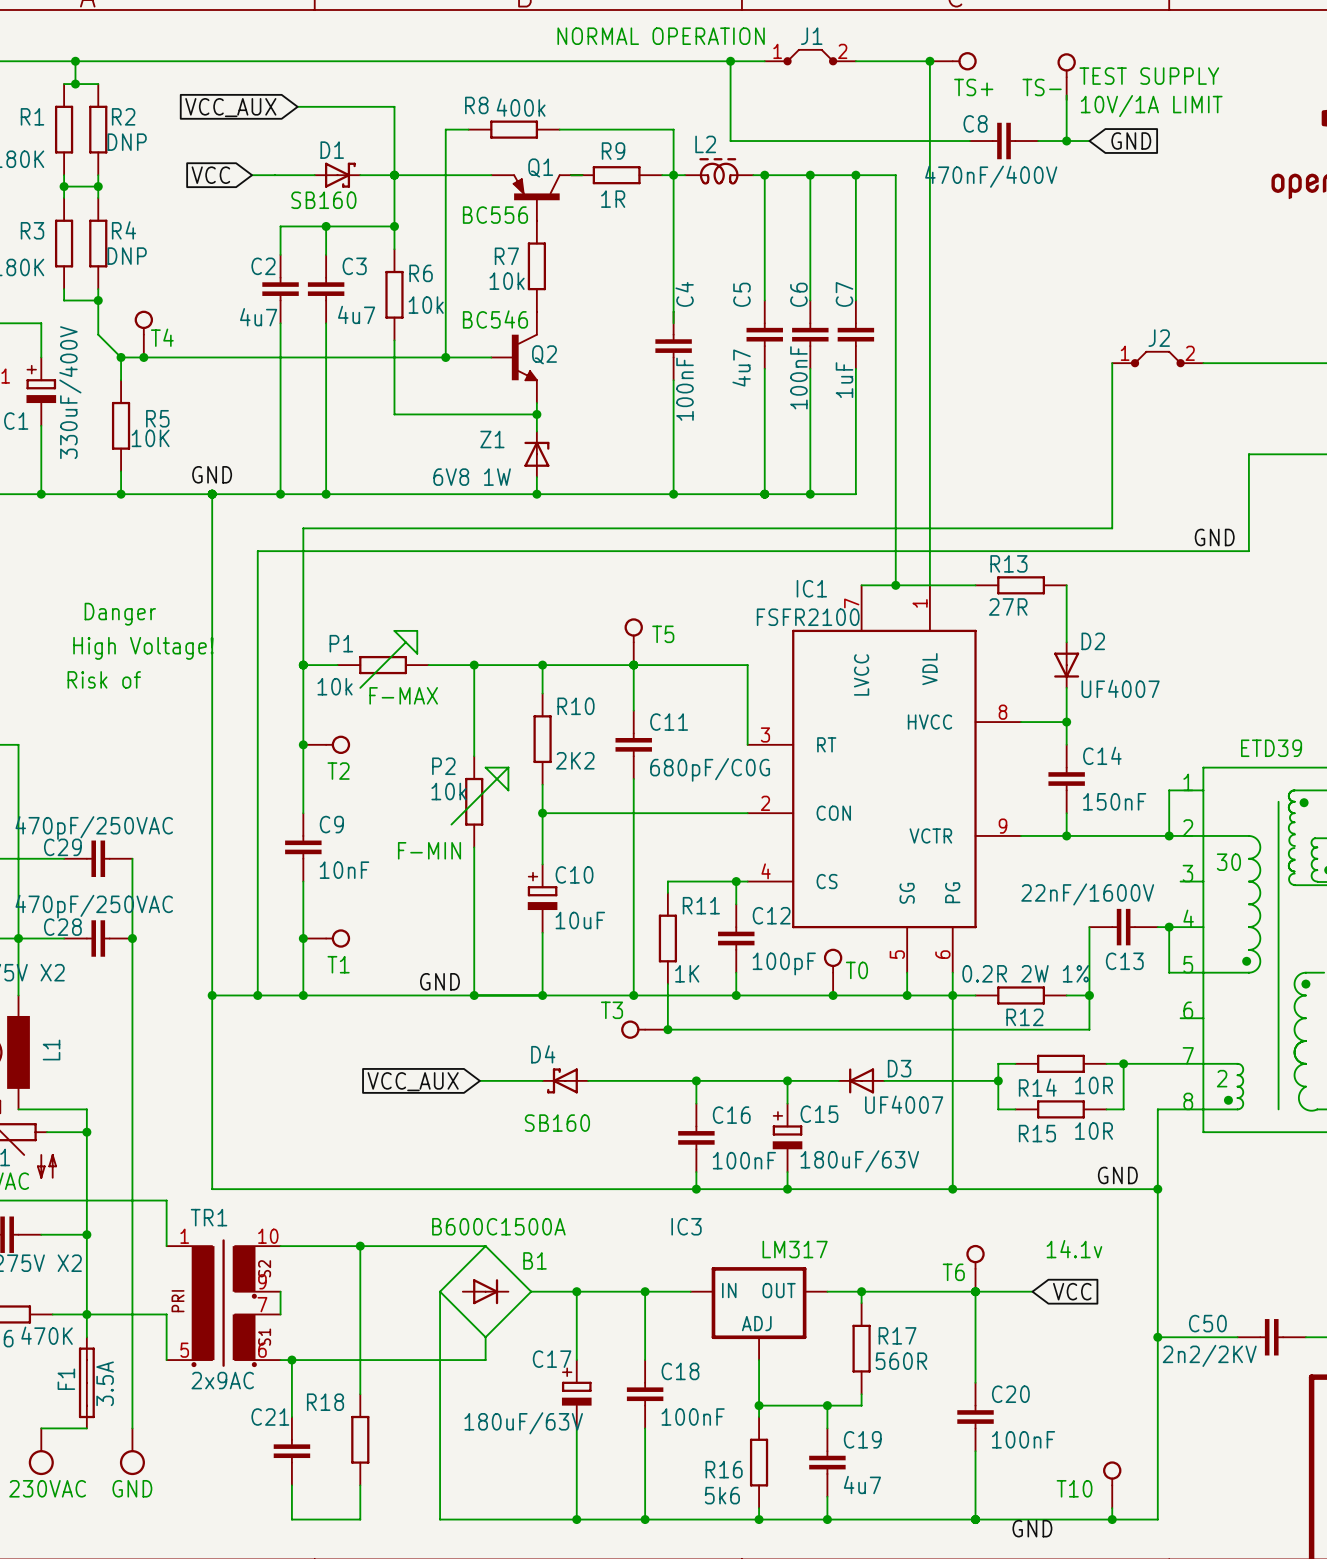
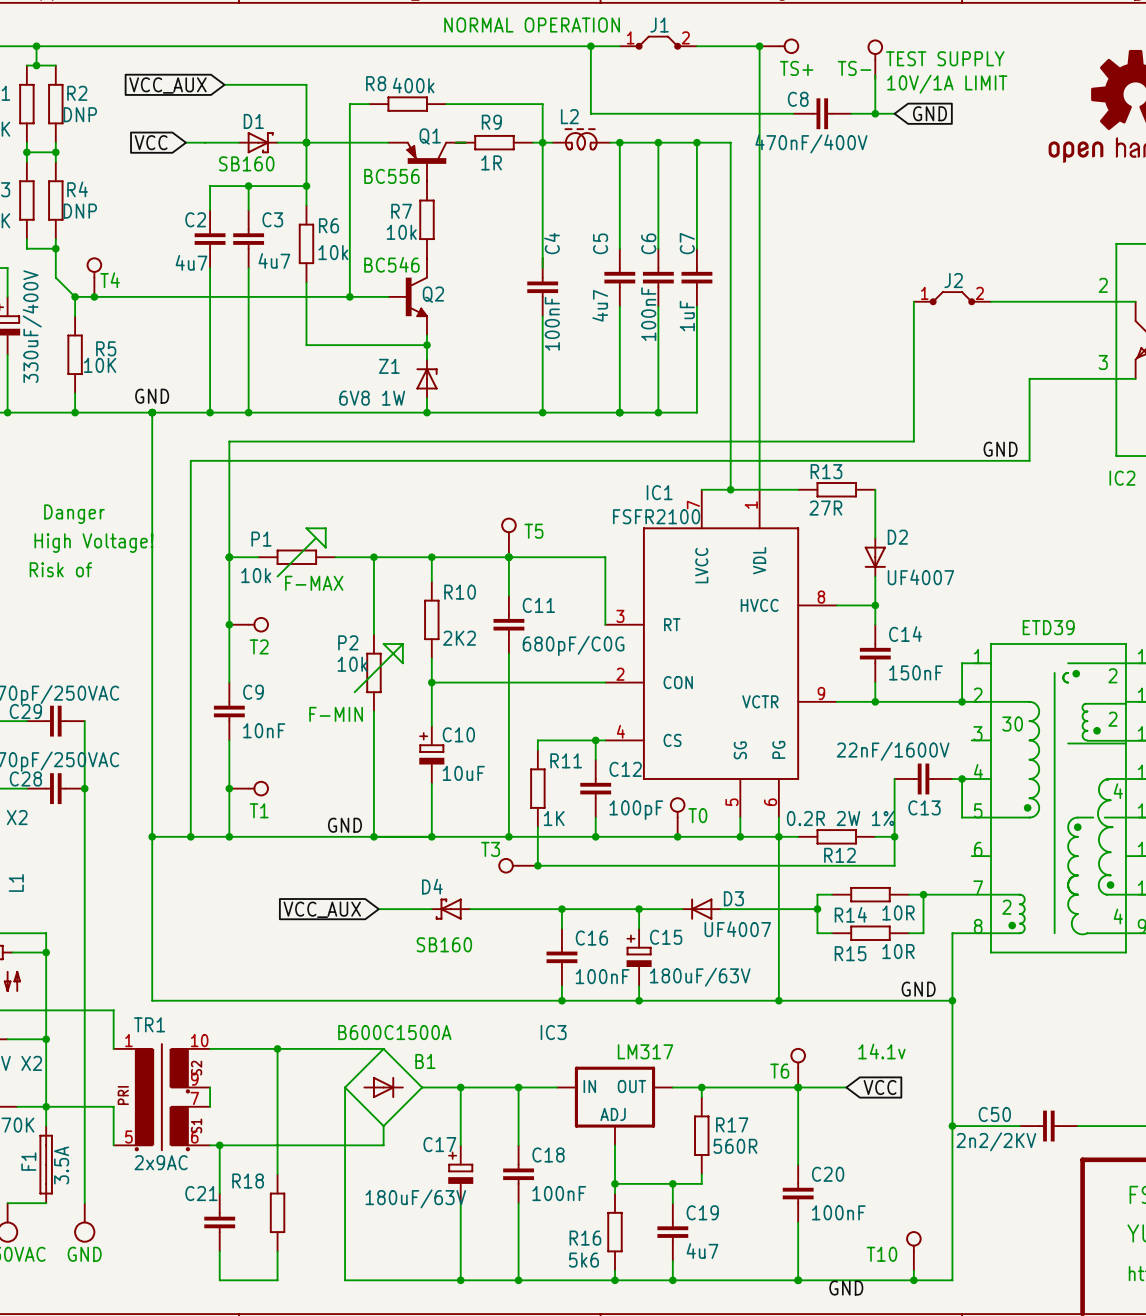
wire: (1294, 790) (1290, 792) (1288, 796) (1290, 800) (1294, 801) (1292, 801) (1290, 800) (1289, 798) (1288, 796) (1289, 793) (1290, 792) (1292, 790) (1294, 790) -> none
wire: (1294, 813) (1289, 817) (1294, 822) (1290, 823) (1288, 828) (1290, 832) (1294, 833) -> none
wire: (1294, 834) (1290, 836) (1289, 840) (1290, 844) (1294, 846) -> none
wire: (1294, 848) (1290, 849) (1288, 853) (1290, 857) (1294, 859) -> none
wire: (1294, 860) (1290, 861) (1288, 865) (1290, 869) (1294, 871) (1292, 871) (1290, 869) (1289, 868) (1288, 865) (1289, 863) (1290, 861) (1292, 860) (1294, 860) -> none
wire: (1294, 873) (1290, 875) (1289, 879) (1290, 883) (1294, 884) -> none

